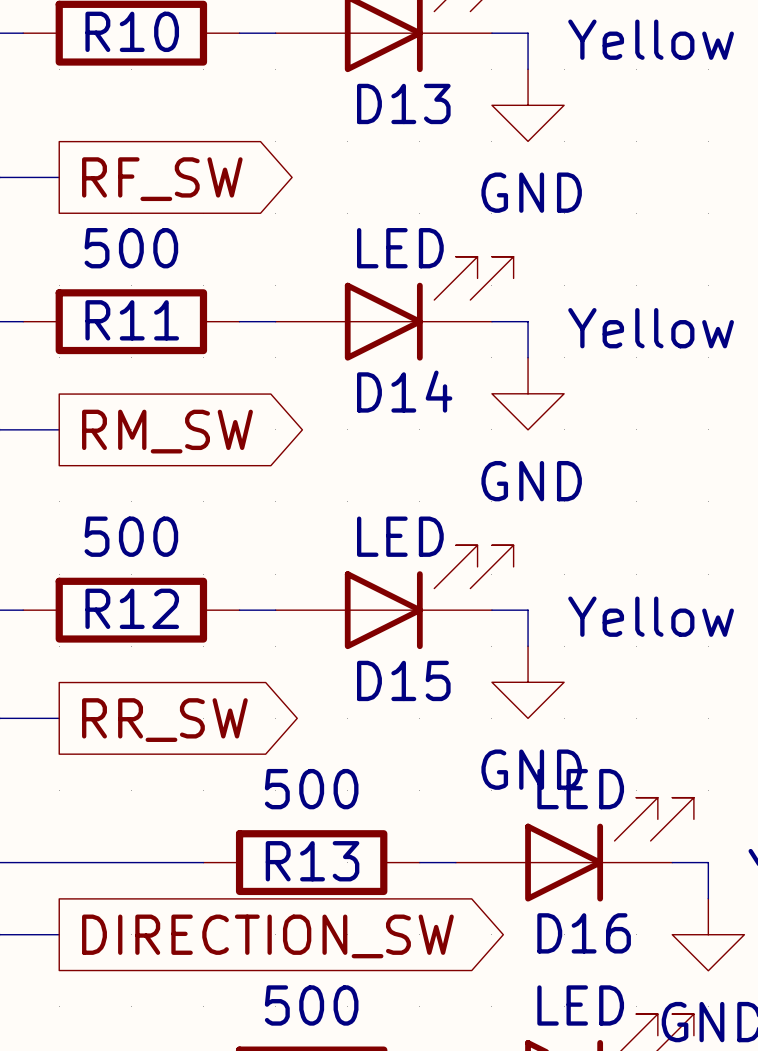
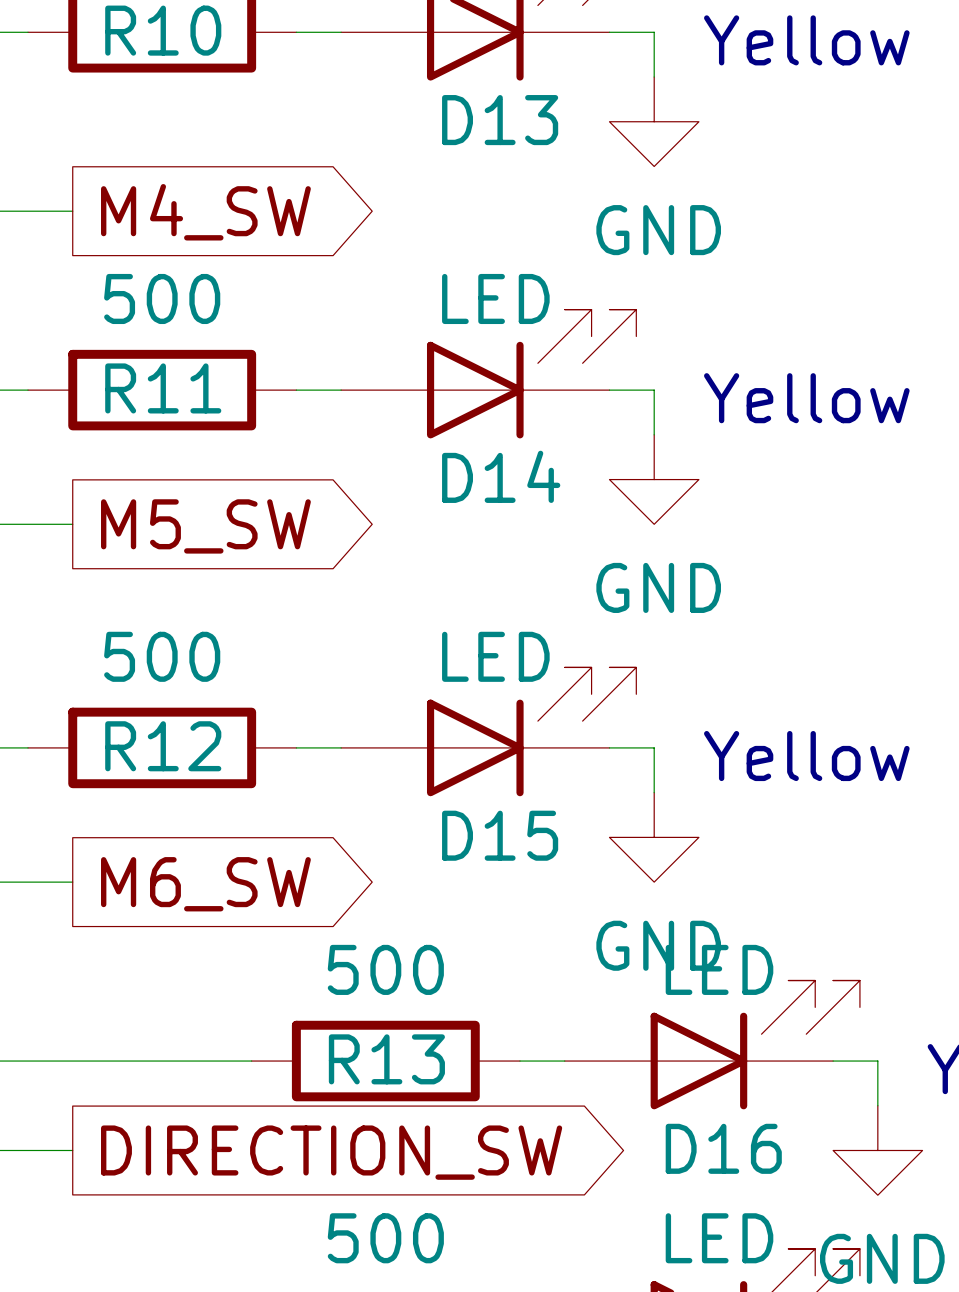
global label: RF_SW (162, 179) -> M4_SW (205, 212)
global label: RM_SW (167, 431) -> M5_SW (205, 526)
global label: RR_SW (164, 720) -> M6_SW (205, 884)

